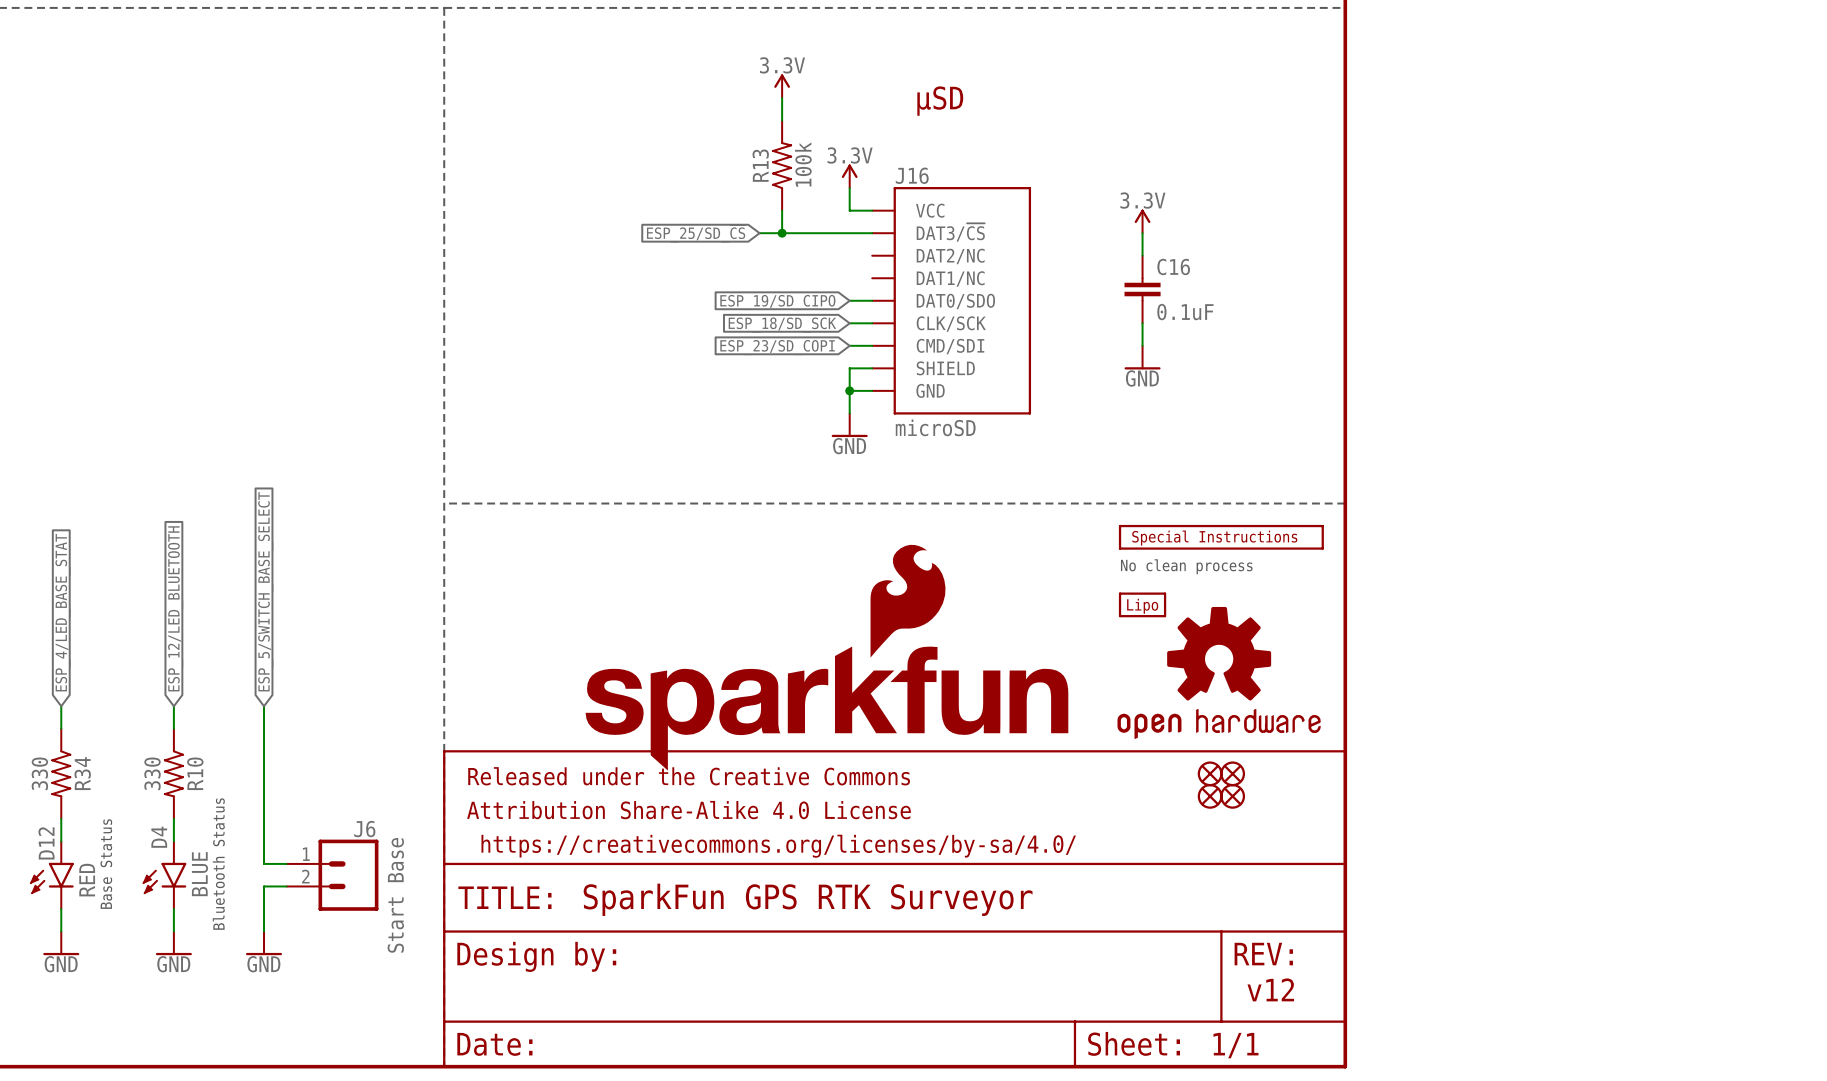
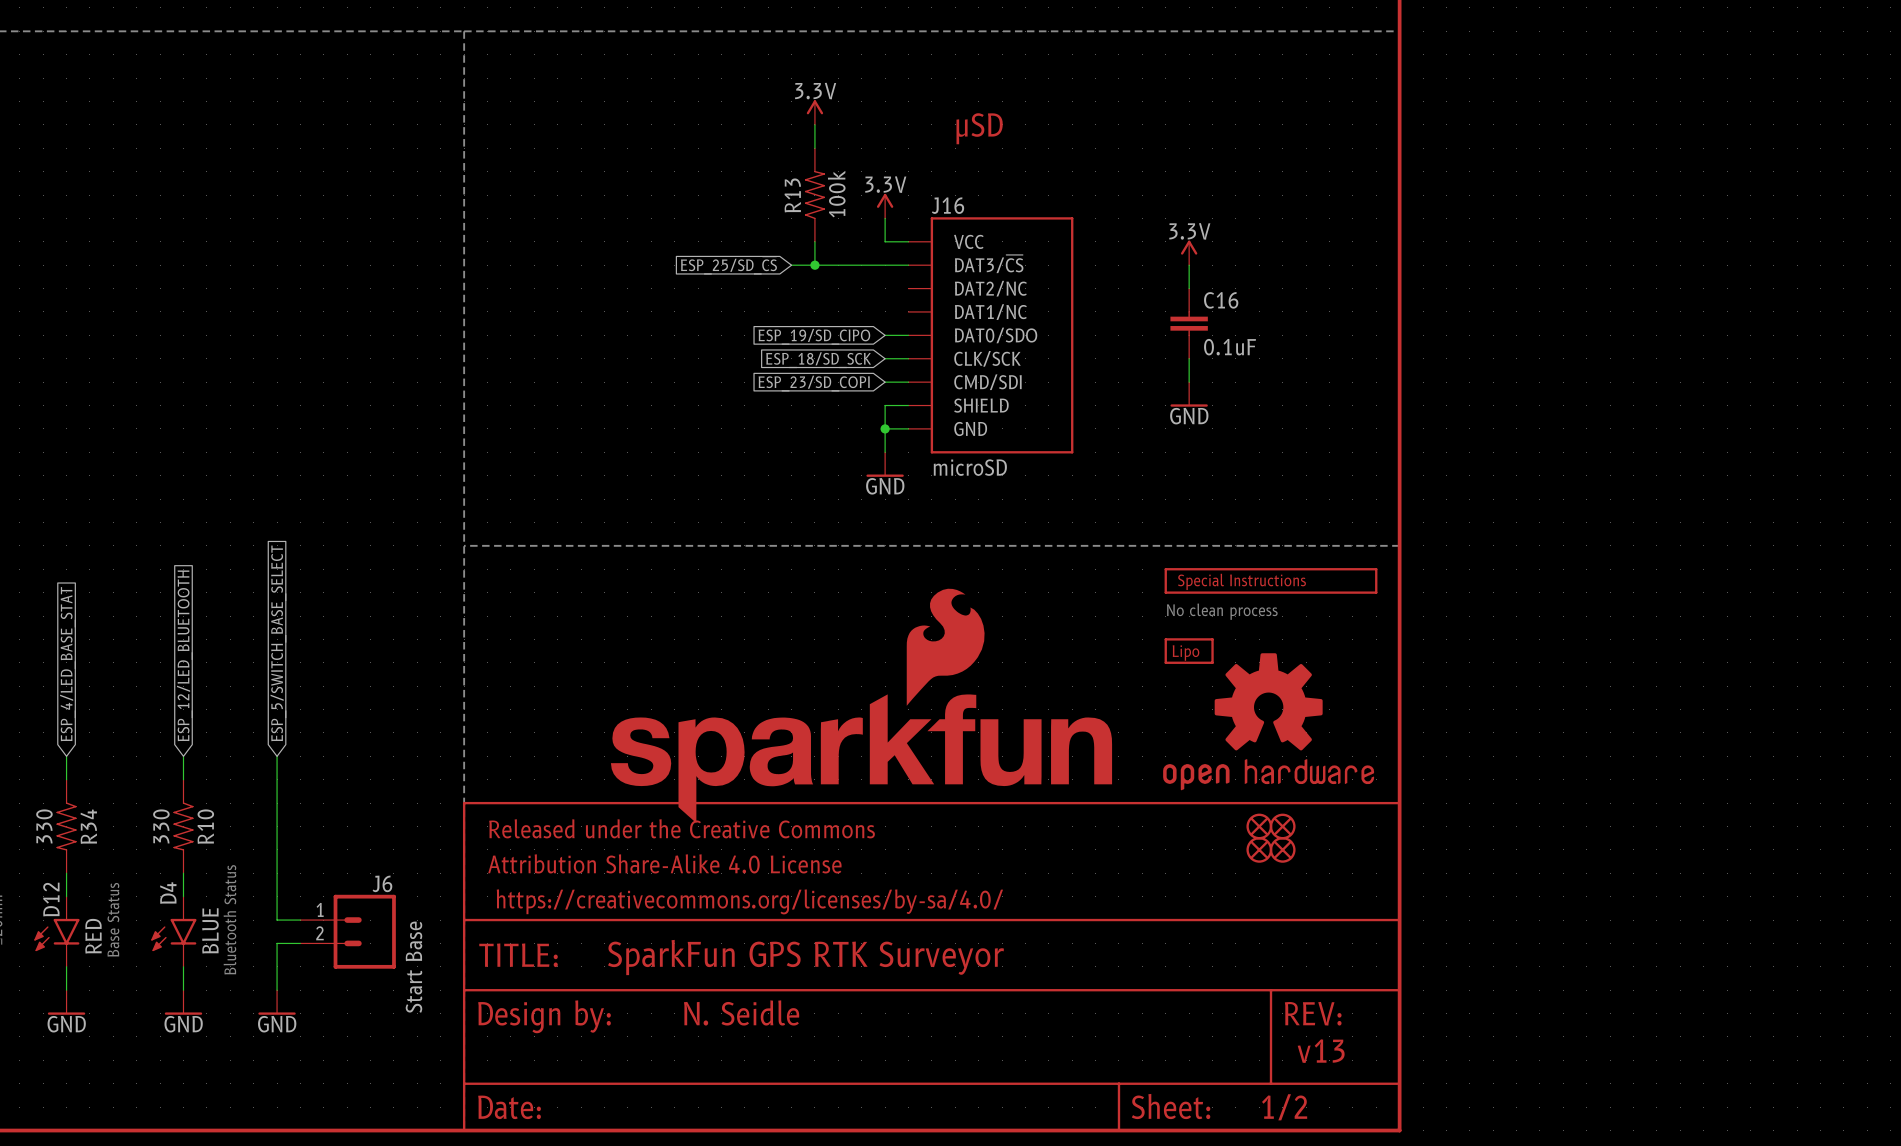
text: none -> N. Seidle (741, 1012)
text: v12 (1270, 989) -> v13 (1321, 1051)
part text: 1/1 (1235, 1045) -> 1/2 (1284, 1107)

